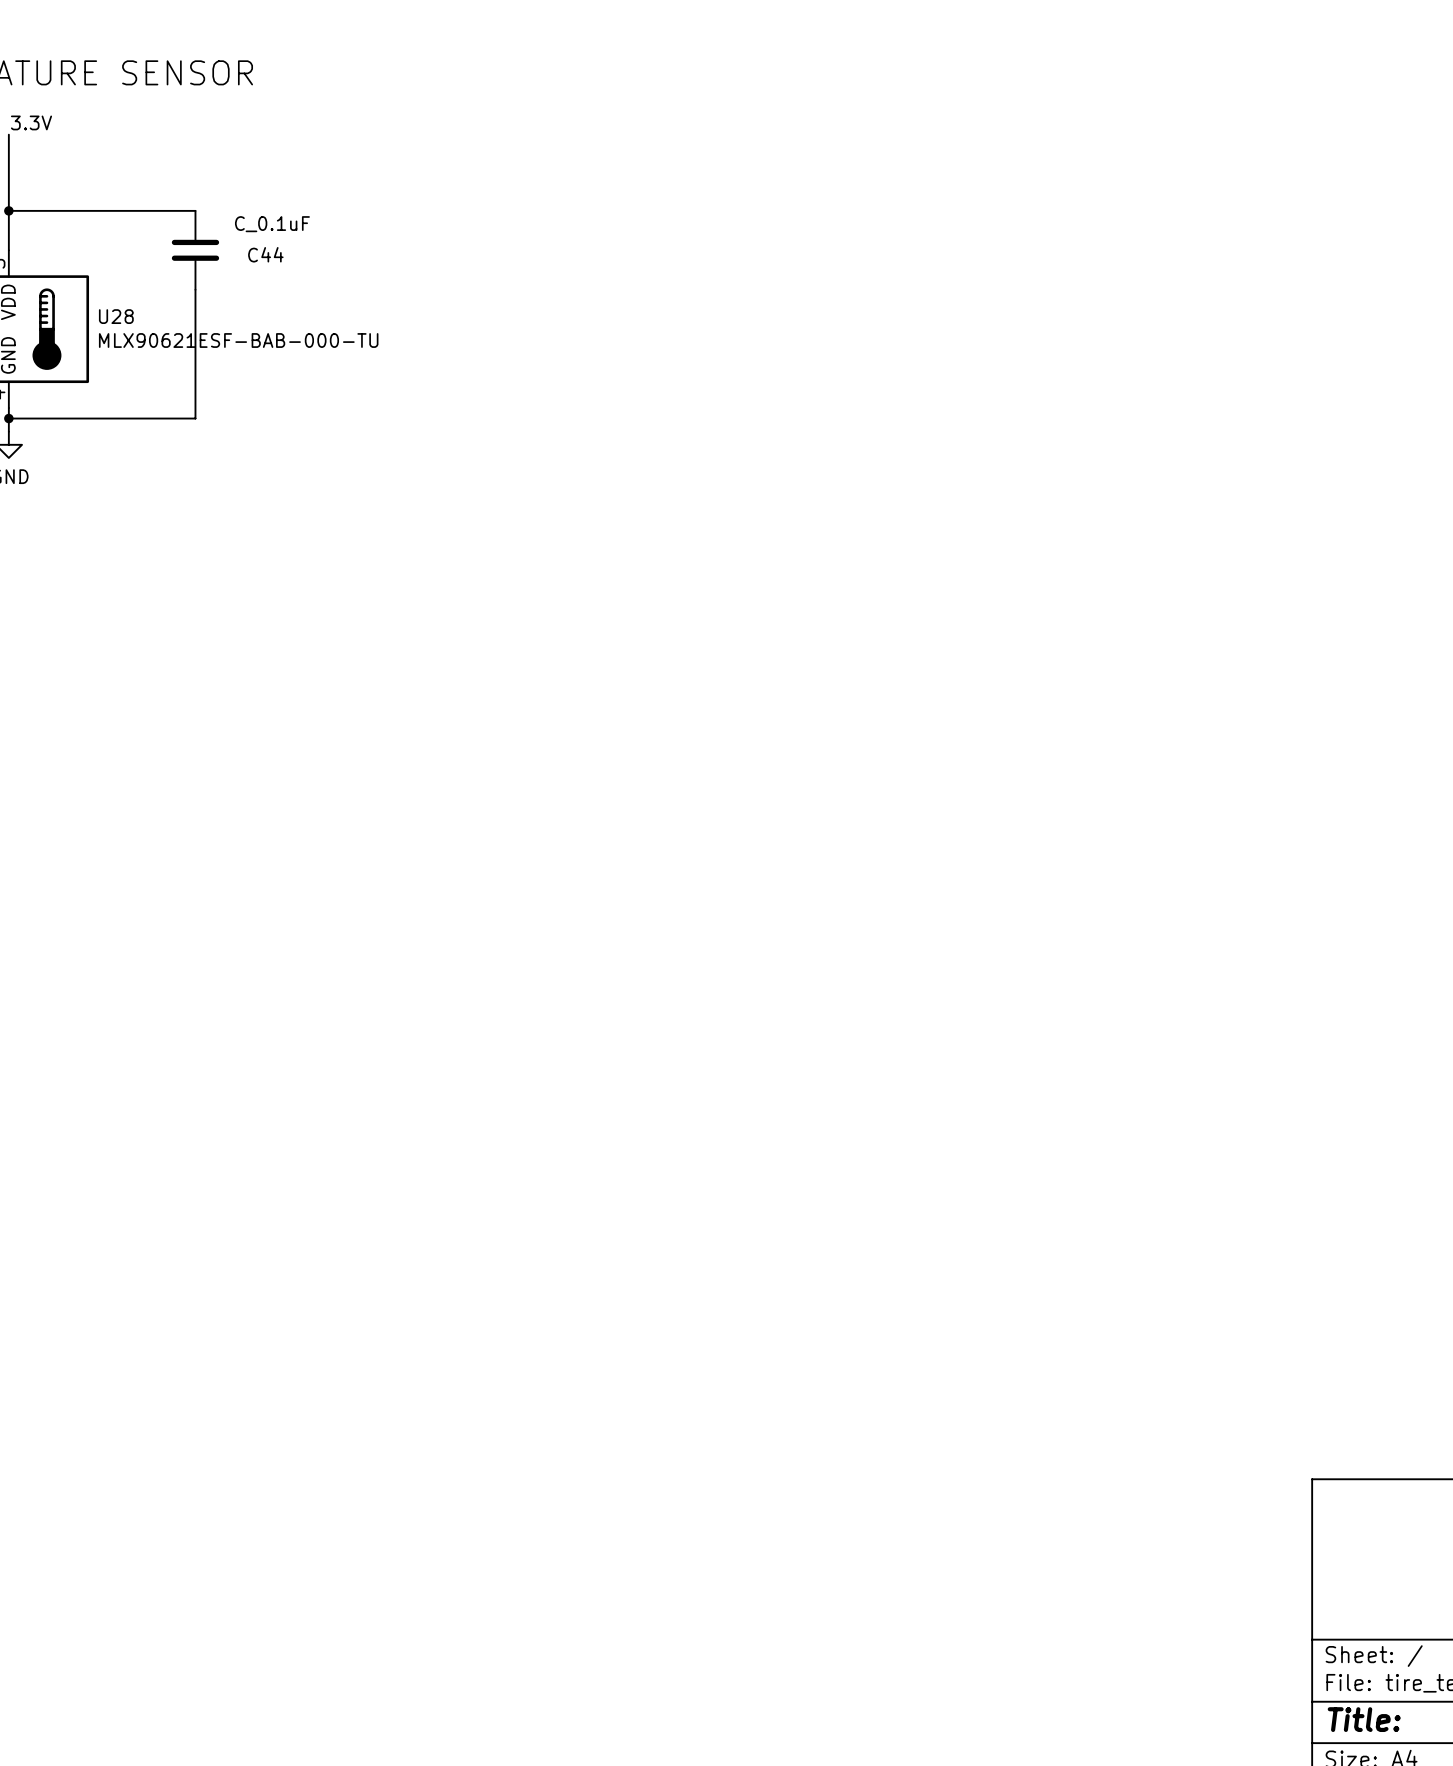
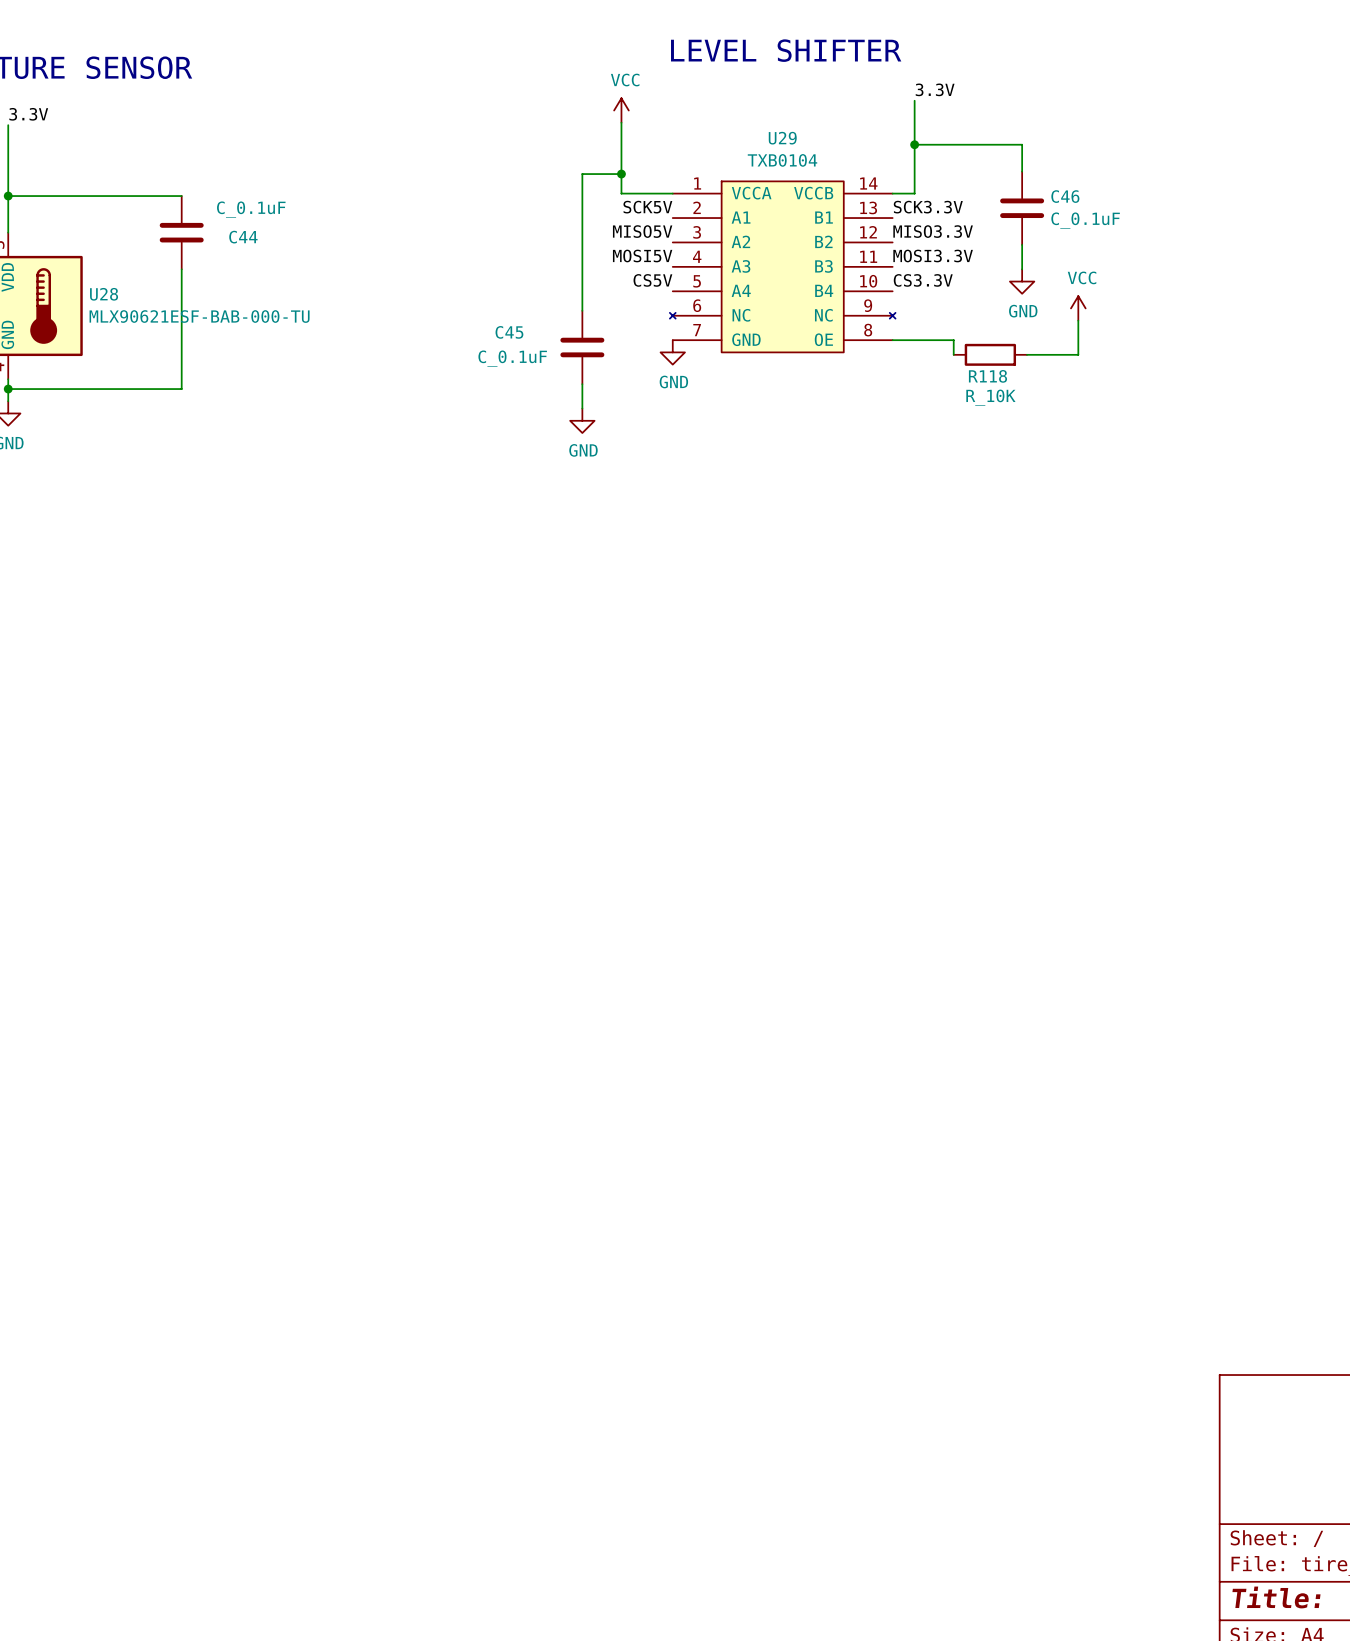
text: none -> LEVEL SHIFTER (786, 50)
label: none -> 3.3V (935, 89)
wire: none -> (914, 100) (914, 193) (892, 193)
power symbol: none -> VCC (621, 110)
wire: none -> (621, 122) (621, 193) (672, 193)
wire: none -> (914, 144) (1022, 144) (1022, 171)
junction: none -> (914, 144)
wire: none -> (621, 174) (582, 174) (582, 310)
junction: none -> (621, 174)
label: none -> SCK5V (647, 207)
label: none -> SCK3.3V (928, 207)
C46: none -> C_0.1uF (1022, 208)
label: none -> MISO5V (642, 231)
label: none -> MISO3.3V (933, 231)
wire: none -> (1022, 244) (1022, 269)
label: none -> MOSI5V (642, 255)
label: none -> MOSI3.3V (933, 255)
U29: none -> TXB0104 (782, 266)
label: none -> CS5V (652, 280)
label: none -> CS3.3V (923, 280)
power symbol: none -> GND (1022, 281)
power symbol: none -> VCC (1078, 308)
wire: none -> (1078, 320) (1078, 354) (1027, 354)
wire: none -> (892, 340) (953, 340) (953, 354)
C45: none -> C_0.1uF (582, 347)
power symbol: none -> GND (672, 352)
R118: none -> R_10K (990, 354)
wire: none -> (582, 384) (582, 408)
power symbol: none -> GND (582, 420)

